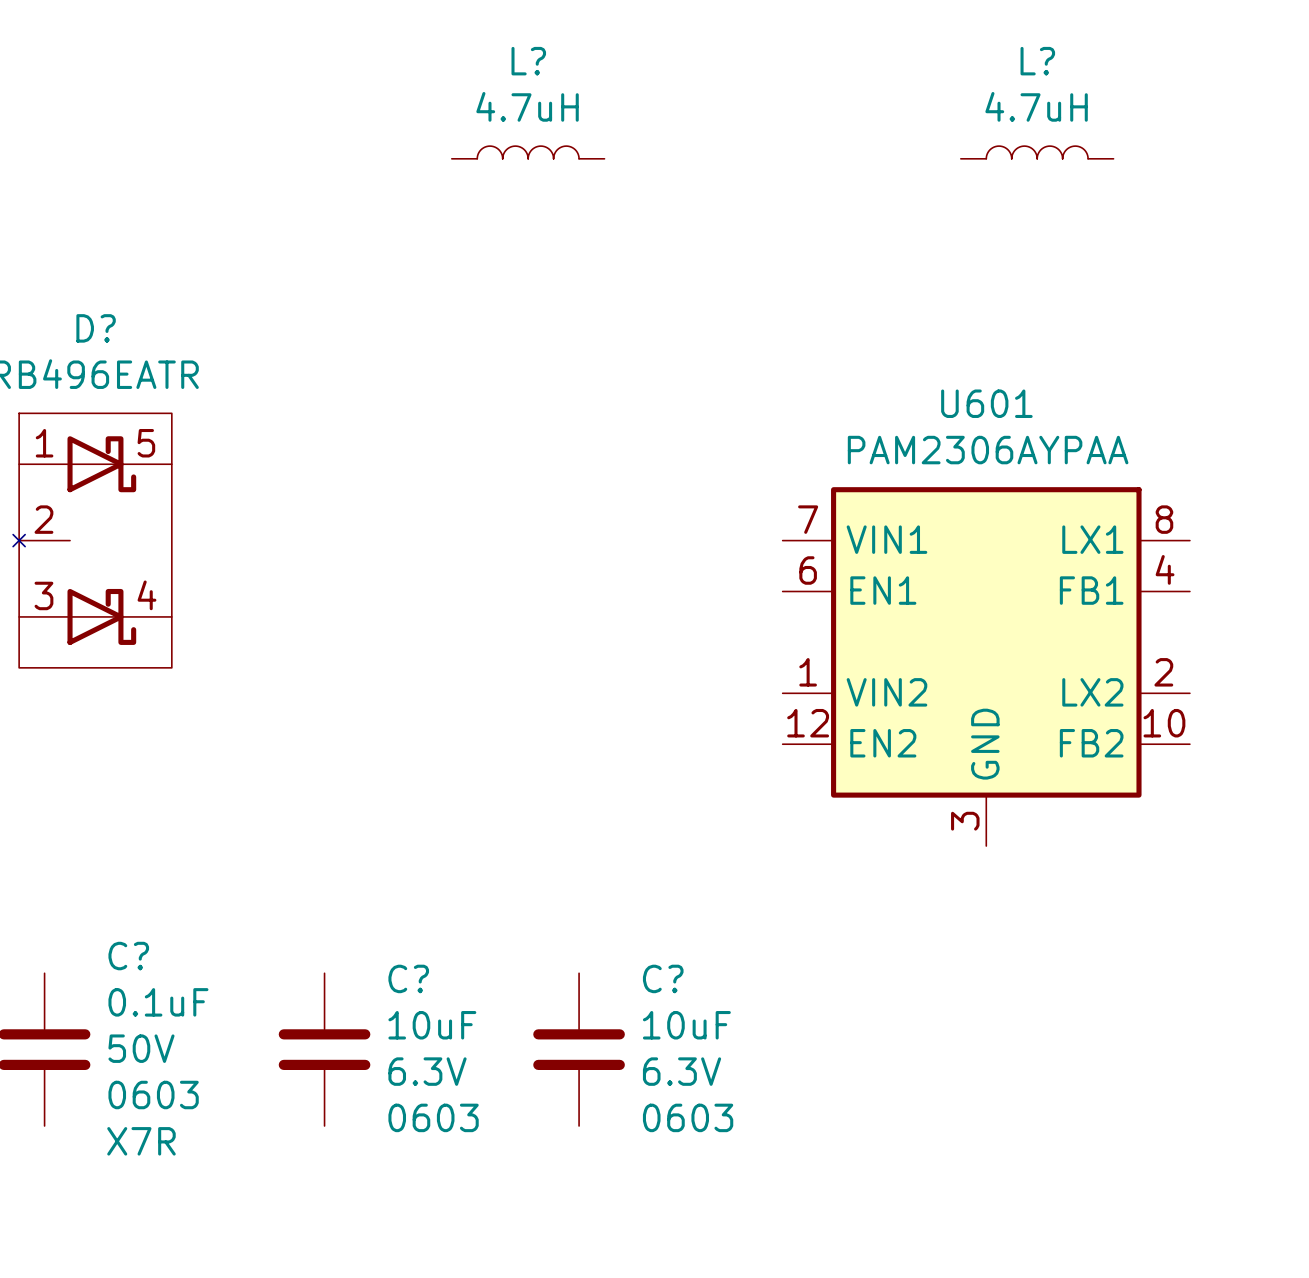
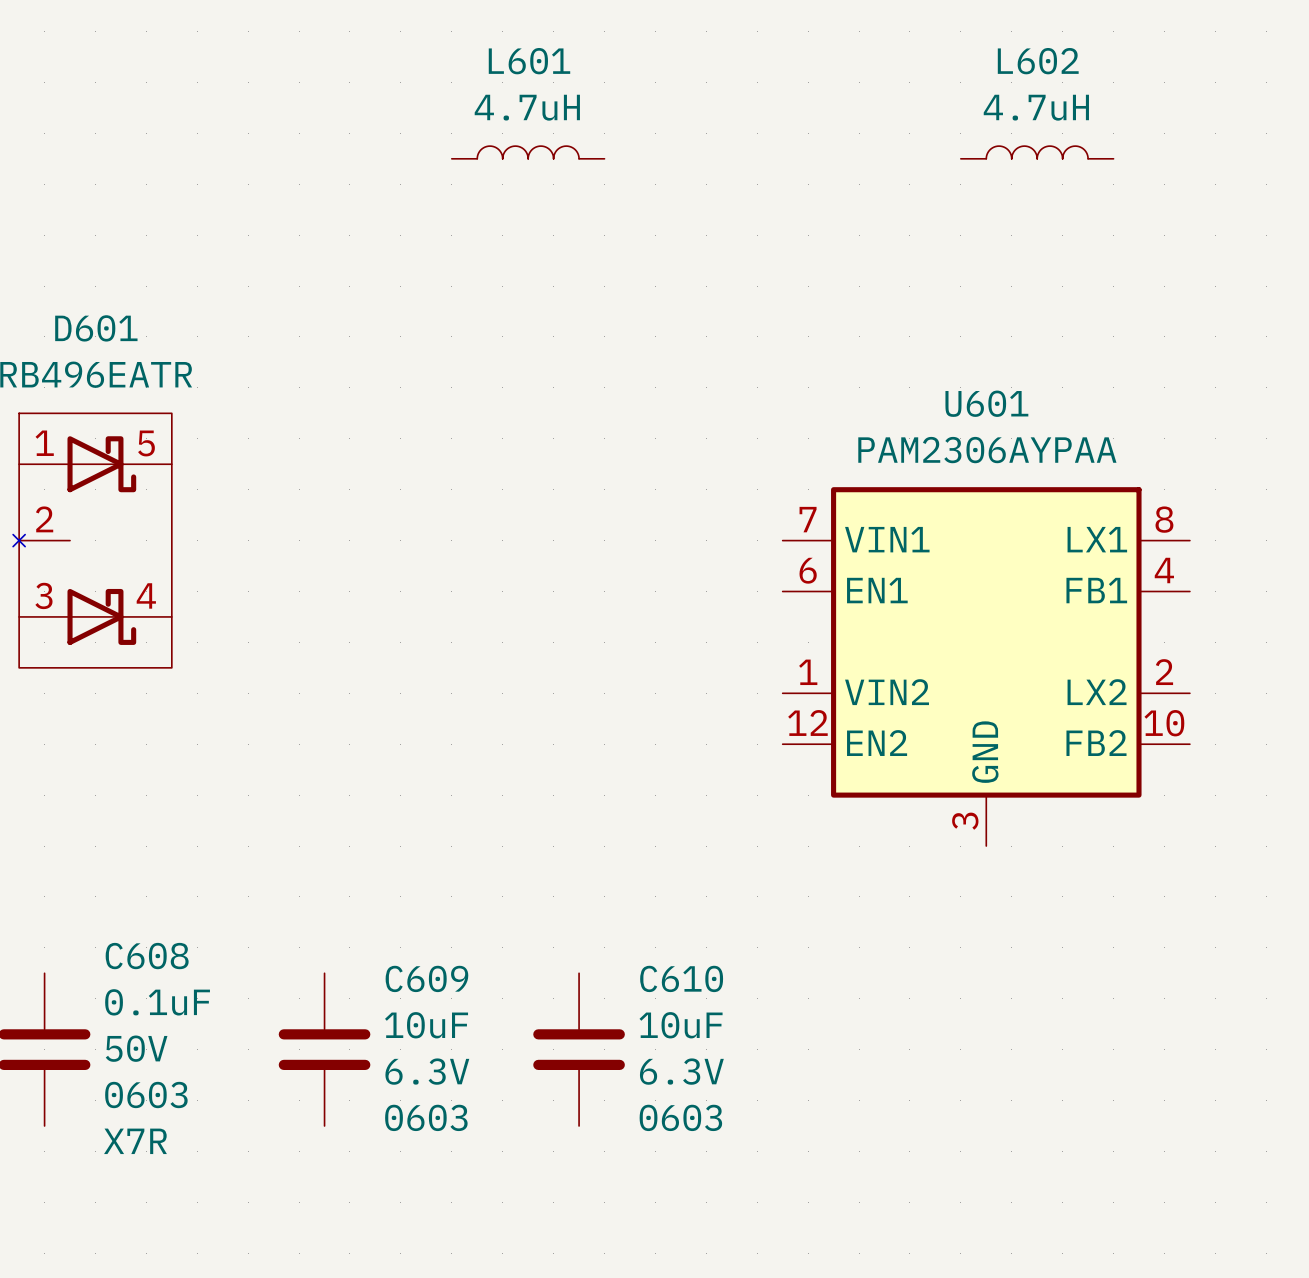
L? name: L? (528, 61) -> L601 (529, 61)
L? name: L? (1037, 61) -> L602 (1038, 61)
D? name: D? (96, 328) -> D601 (96, 328)
C? name: C? (128, 956) -> C608 (147, 956)
C? name: C? (408, 978) -> C609 (426, 978)
C? name: C? (663, 978) -> C610 (681, 978)

